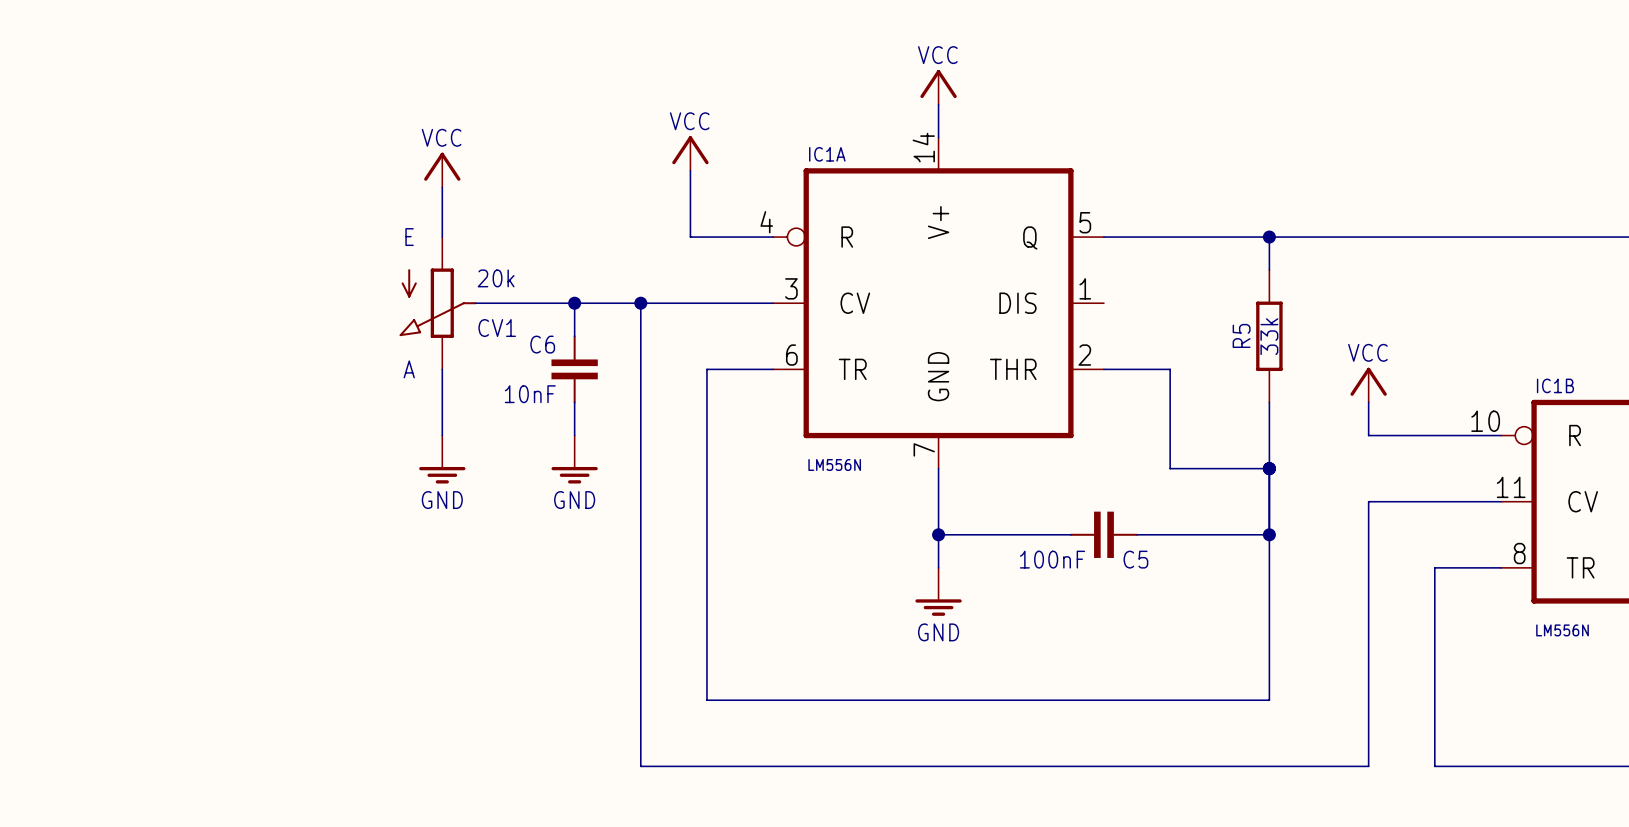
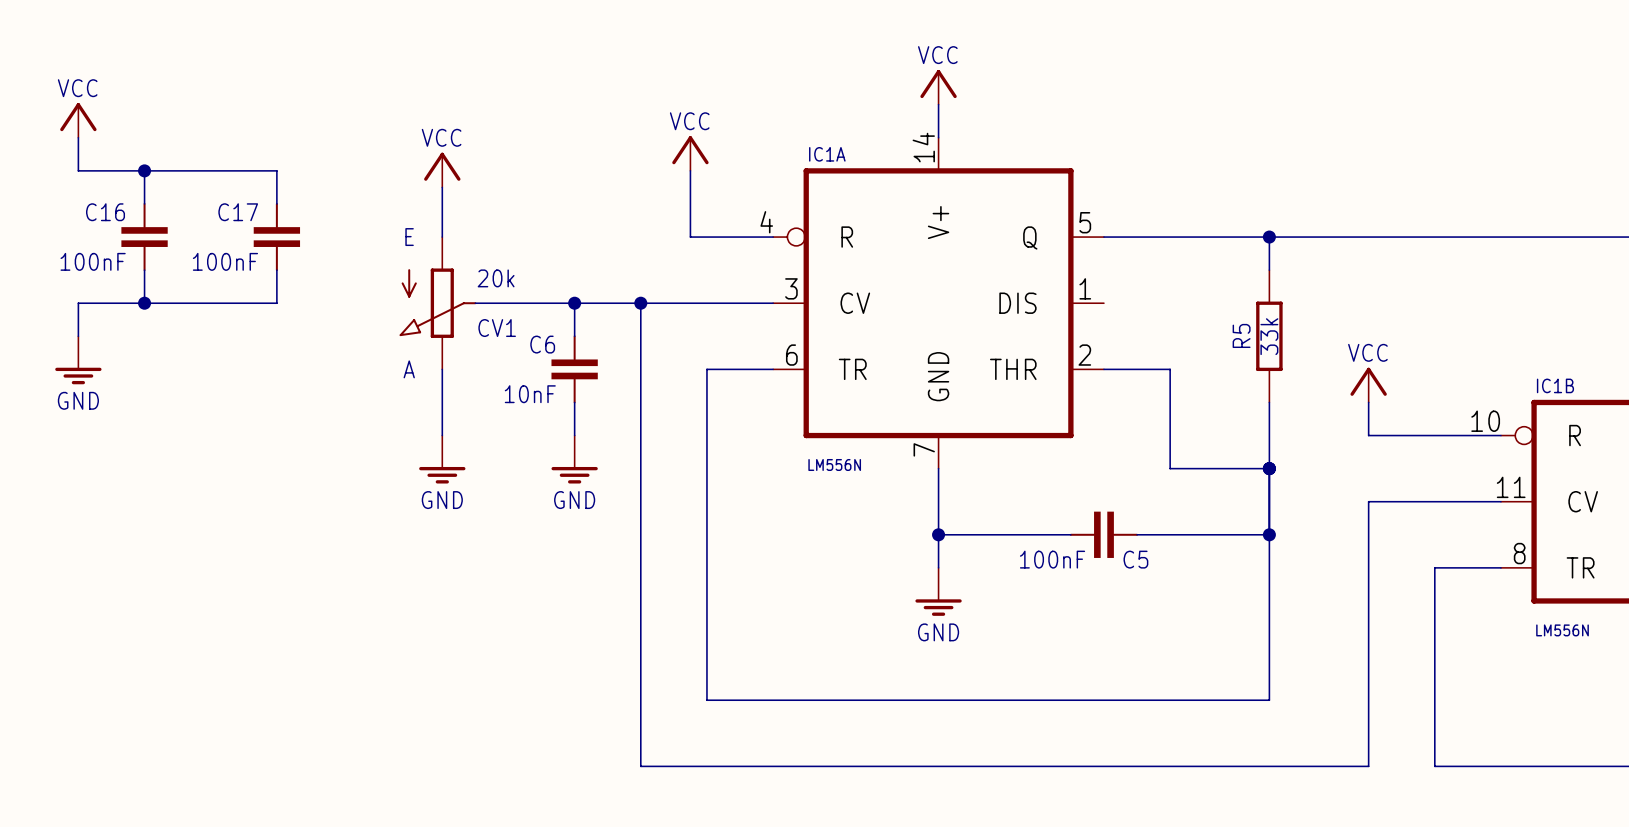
power symbol: none -> VCC (78, 120)
wire: none -> (78, 137) (78, 170) (276, 170) (276, 203)
wire: none -> (144, 170) (144, 203)
junction: none -> (144, 170)
C16: none -> 100nF (144, 237)
C17: none -> 100nF (276, 237)
wire: none -> (144, 270) (144, 303)
wire: none -> (276, 270) (276, 303) (78, 303) (78, 336)
junction: none -> (144, 303)
power symbol: none -> GND (78, 360)

